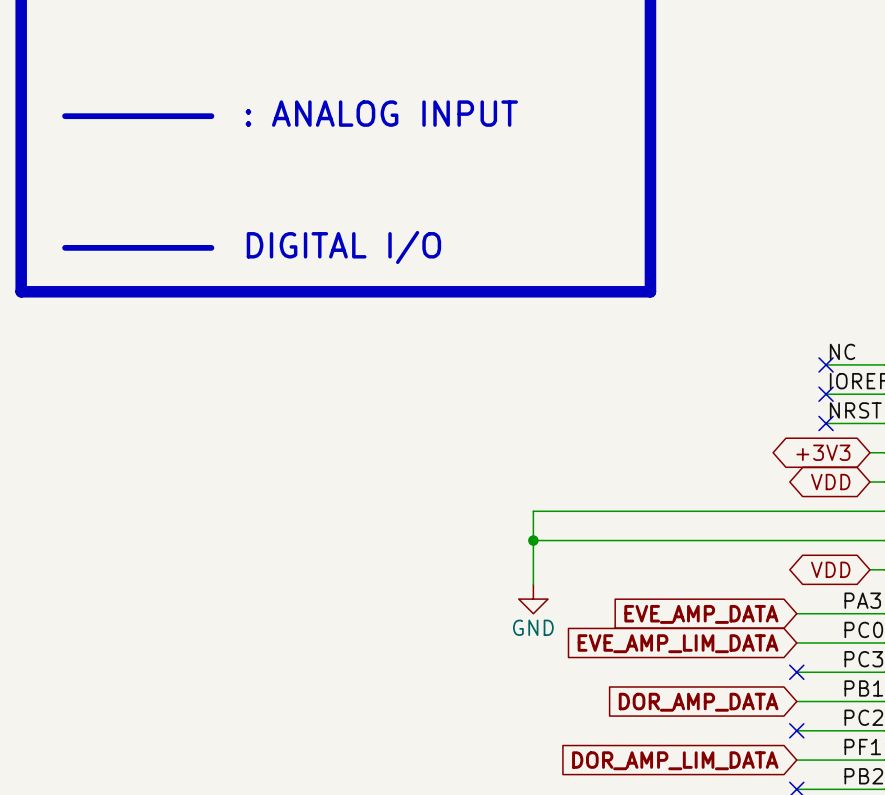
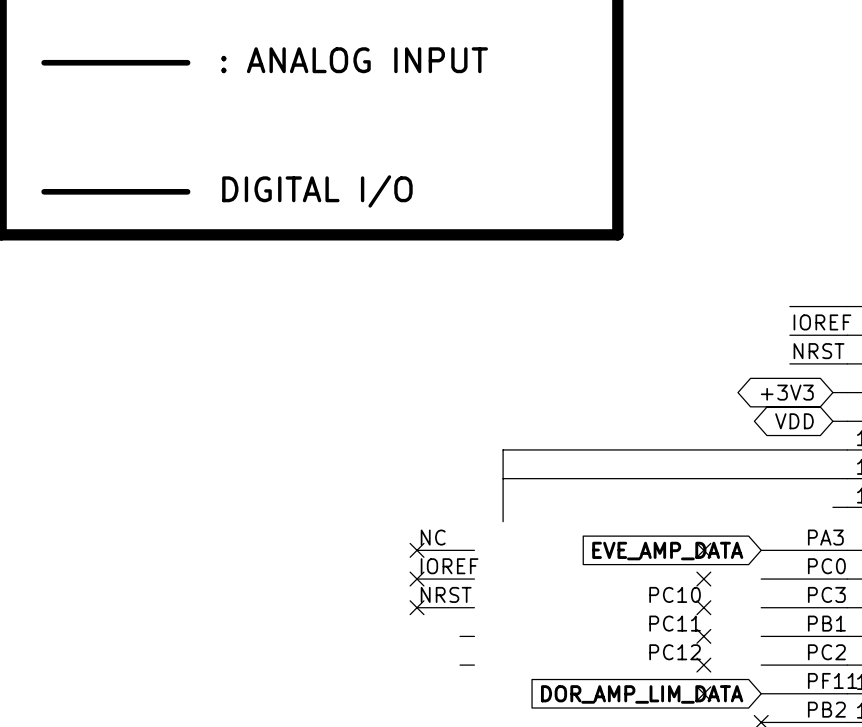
label: NC (842, 351) -> none
no-connect mark: (826, 364) -> none
no-connect mark: (826, 394) -> none
no-connect mark: (826, 423) -> none
junction: (533, 540) -> none
global label: VDD (830, 569) -> none
power symbol: GND (533, 599) -> none
label: none -> NC (433, 537)
wire: none -> (417, 550) (474, 550)
no-connect mark: none -> (417, 550)
no-connect mark: none -> (703, 550)
label: none -> IOREF (449, 566)
wire: none -> (417, 579) (474, 579)
no-connect mark: none -> (417, 579)
no-connect mark: none -> (703, 579)
global label: EVE_AMP_LIM_DATA (678, 643) -> none
label: none -> NRST (446, 594)
label: none -> PC10 (675, 594)
wire: none -> (417, 607) (474, 607)
no-connect mark: none -> (417, 607)
no-connect mark: none -> (703, 607)
no-connect mark: (796, 672) -> none
label: none -> PC11 (675, 623)
wire: none -> (460, 636) (474, 636)
no-connect mark: none -> (703, 636)
global label: DOR_AMP_DATA (698, 702) -> none
label: none -> PC12 (675, 652)
wire: none -> (460, 665) (474, 665)
no-connect mark: none -> (703, 665)
no-connect mark: (796, 730) -> none
no-connect mark: none -> (703, 693)

